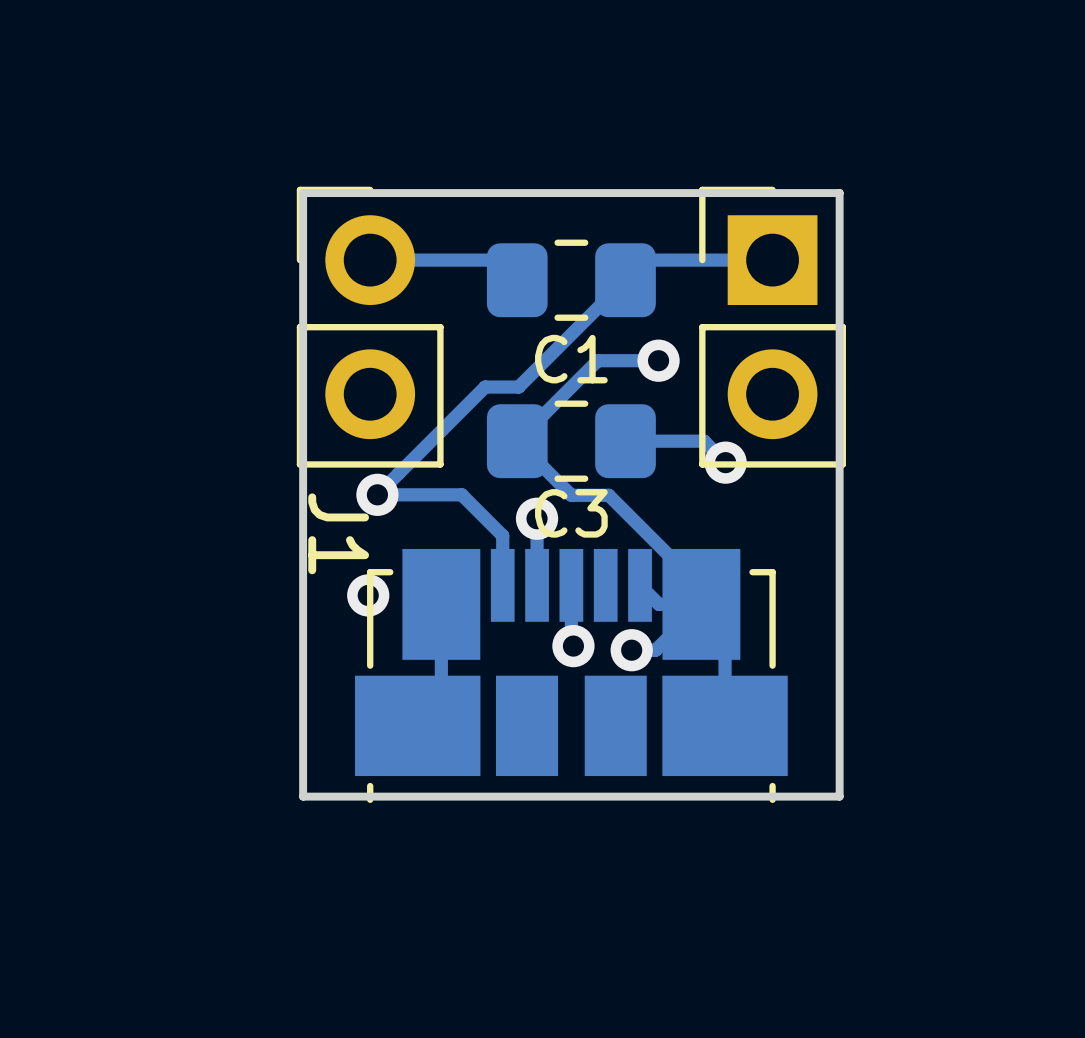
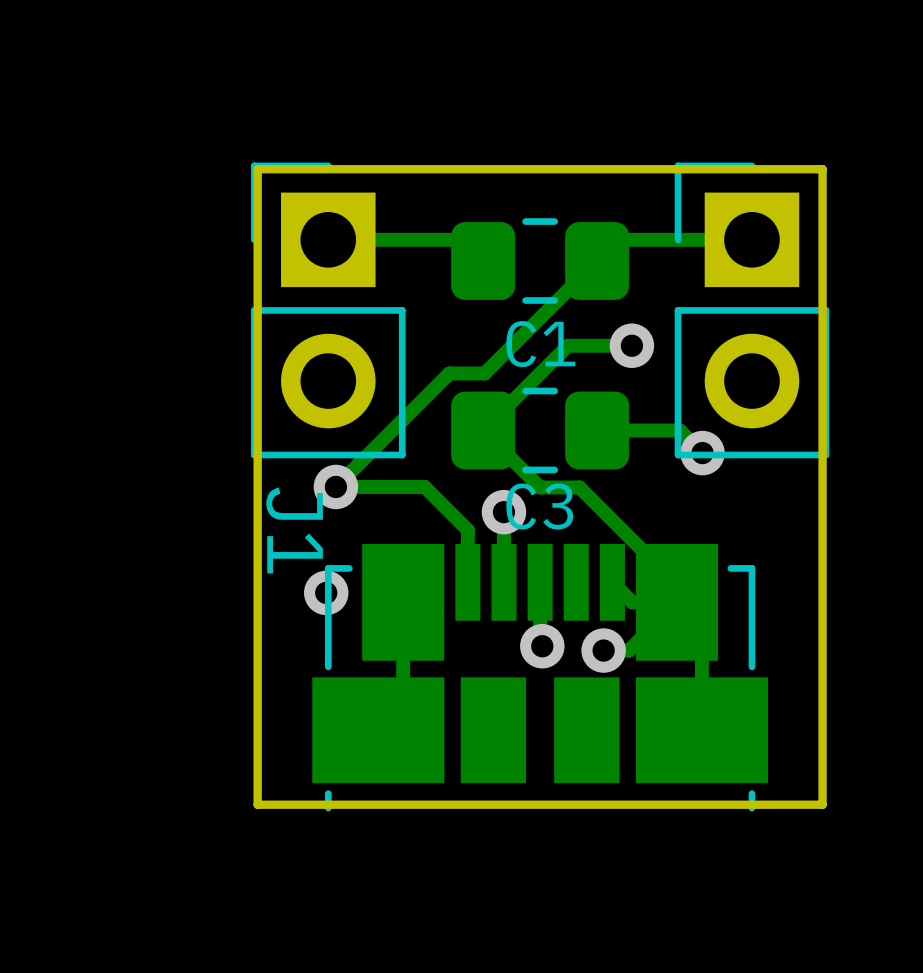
part footprint: [296, 186, 444, 468] -> [251, 162, 406, 459]

